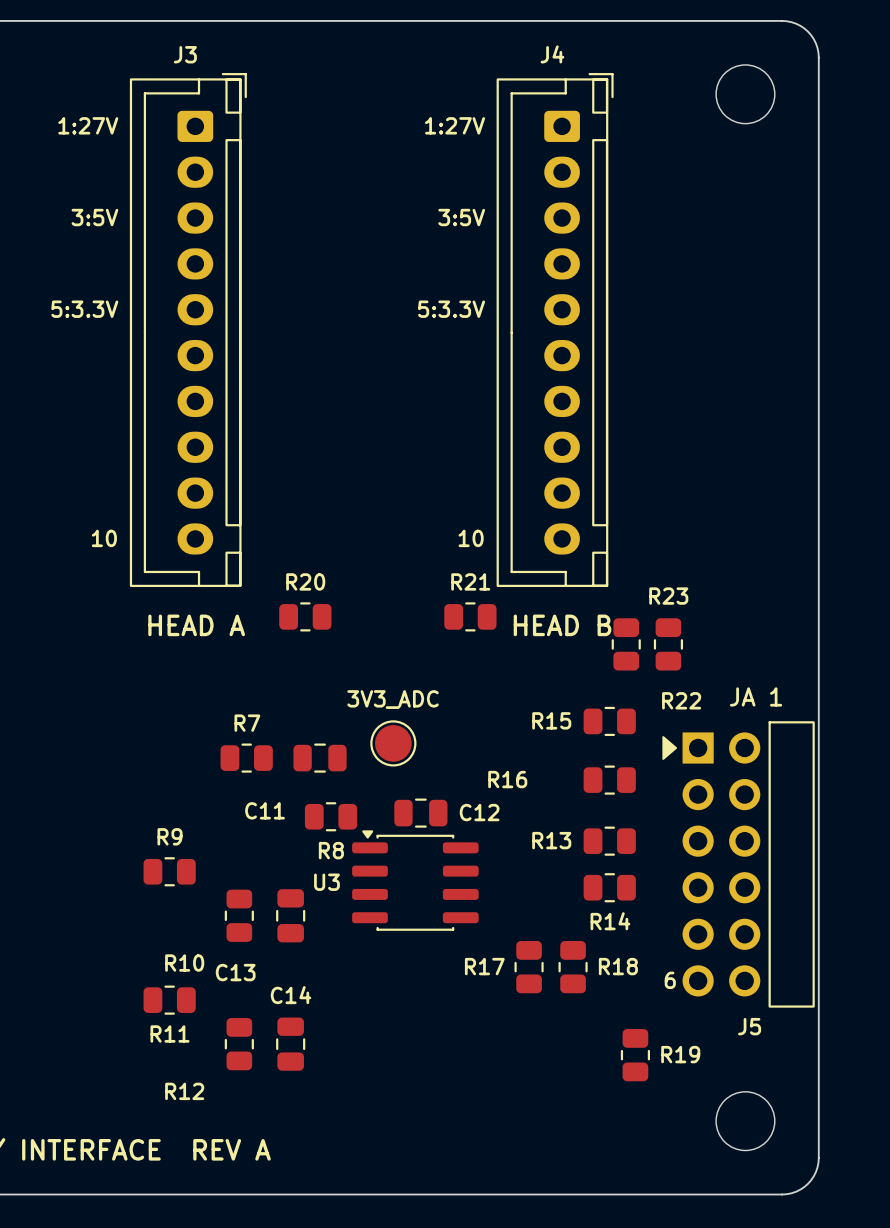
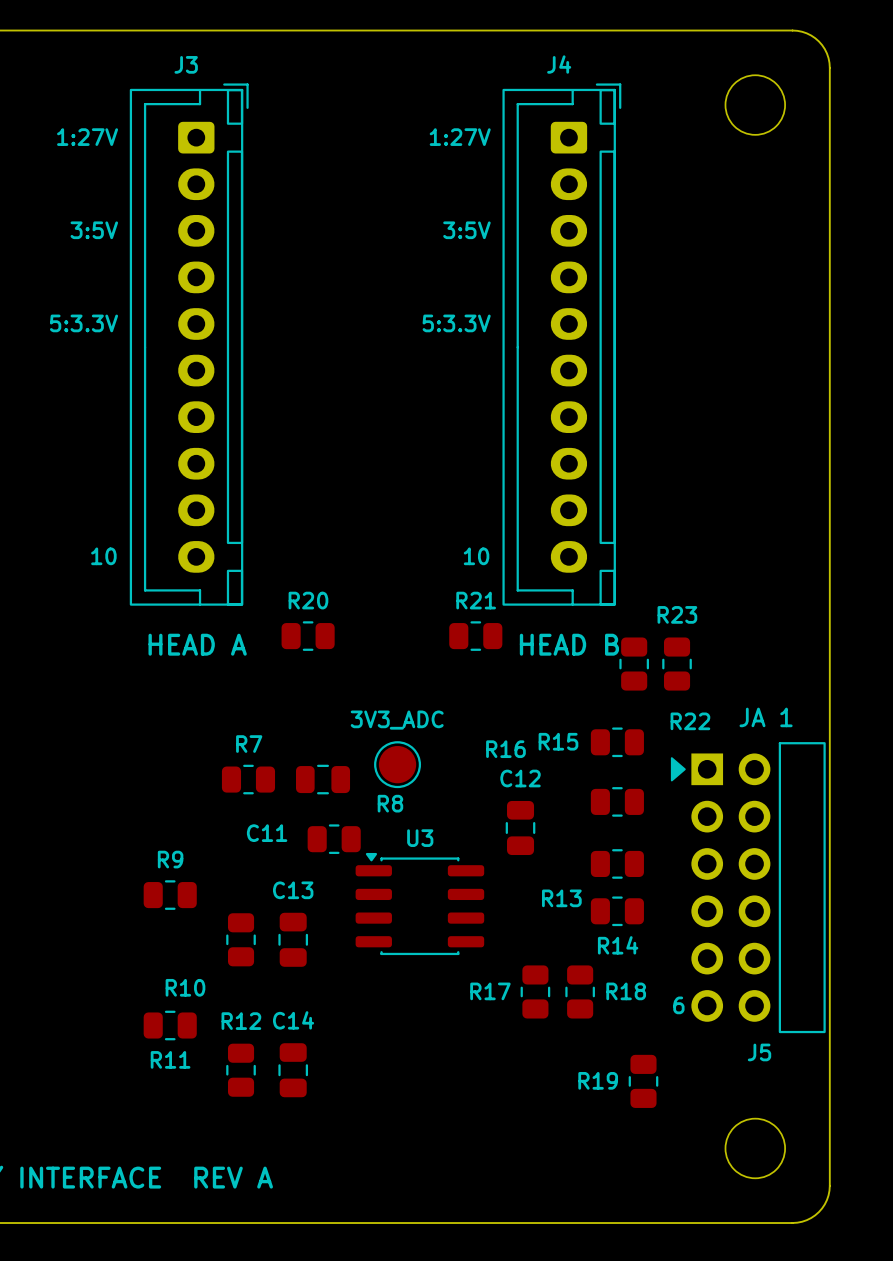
R16 name position: R16 (507, 779) -> R16 (505, 749)
C12 name position: C12 (479, 812) -> C12 (520, 778)
C12 rotation: 0° (420, 813) -> 90° clockwise (520, 827)
C12 position: (420, 813) -> (520, 827)
R13 name position: R13 (551, 840) -> R13 (561, 898)
R8 name position: R8 (331, 850) -> R8 (390, 803)
U3 name position: U3 (326, 882) -> U3 (420, 838)
C13 name position: C13 (235, 972) -> C13 (293, 890)
R19 name position: R19 (680, 1054) -> R19 (598, 1080)
R12 name position: R12 (184, 1091) -> R12 (241, 1021)

